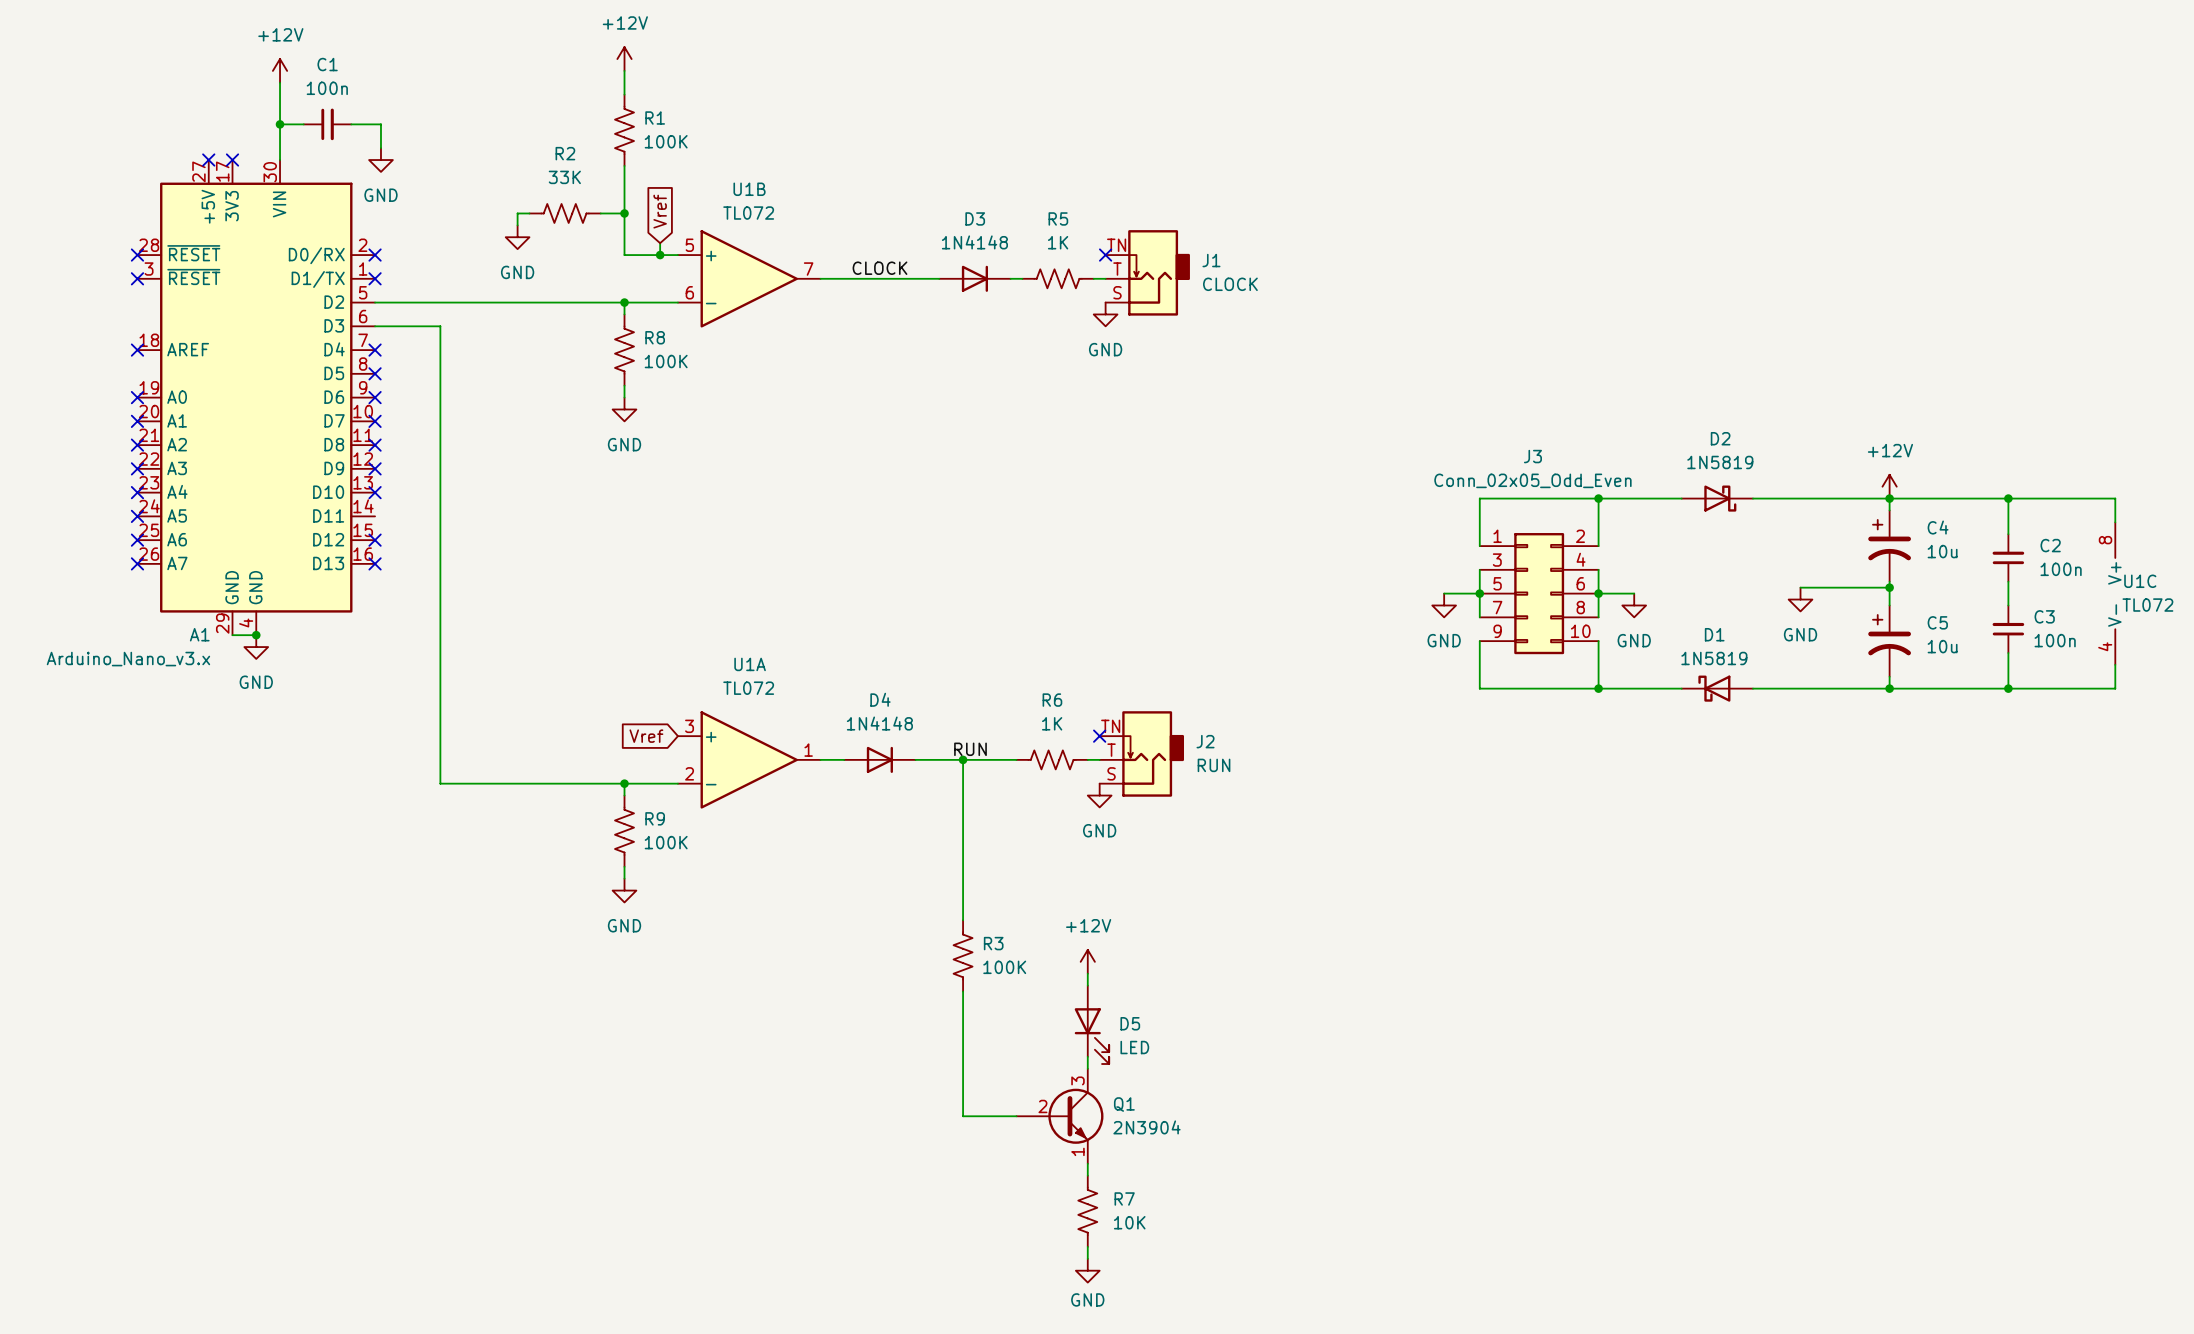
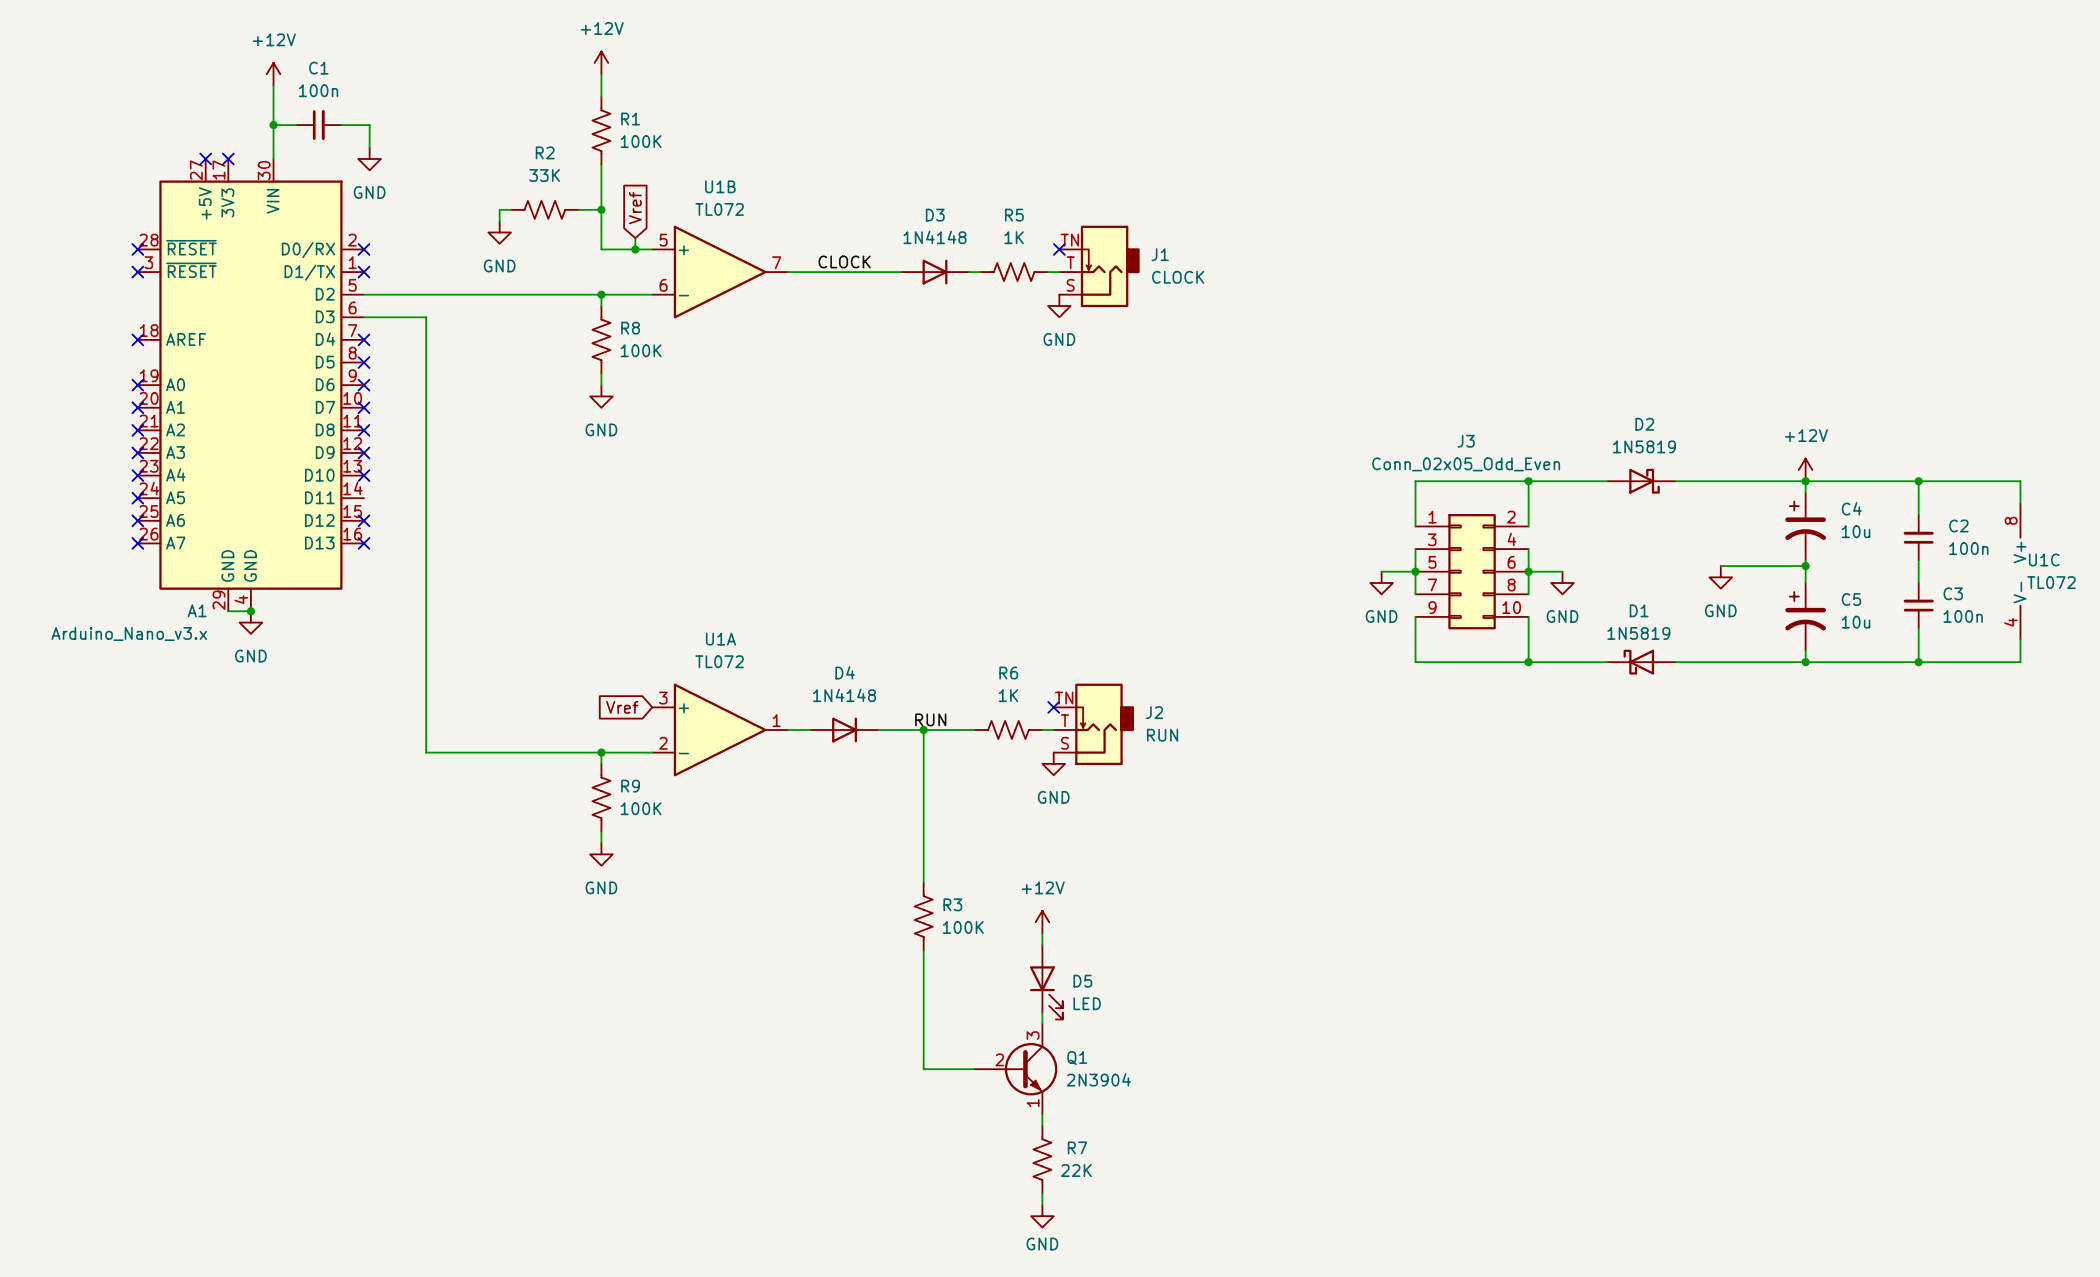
R7 value: 10K (1129, 1222) -> 22K (1076, 1170)

